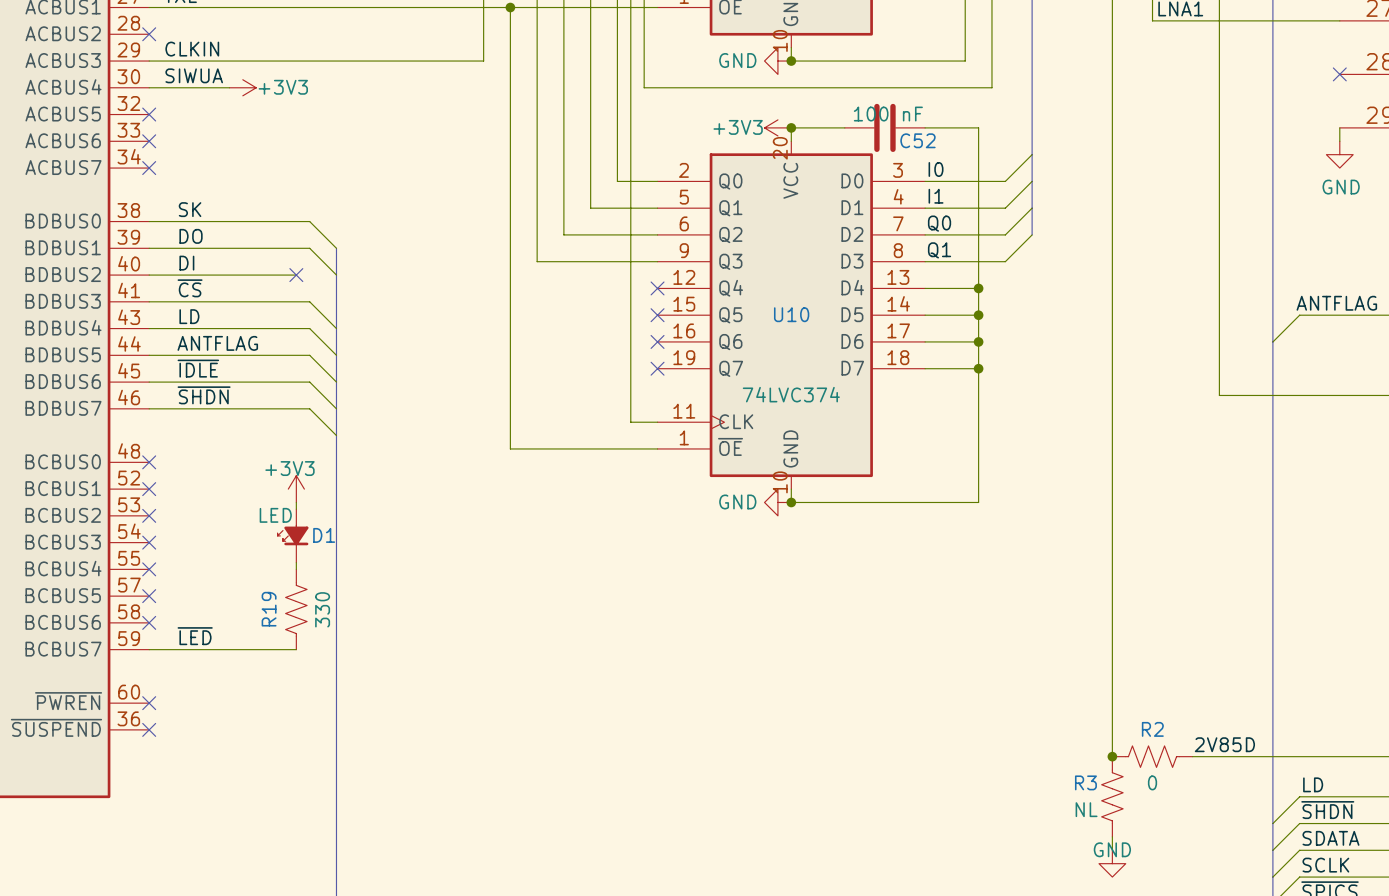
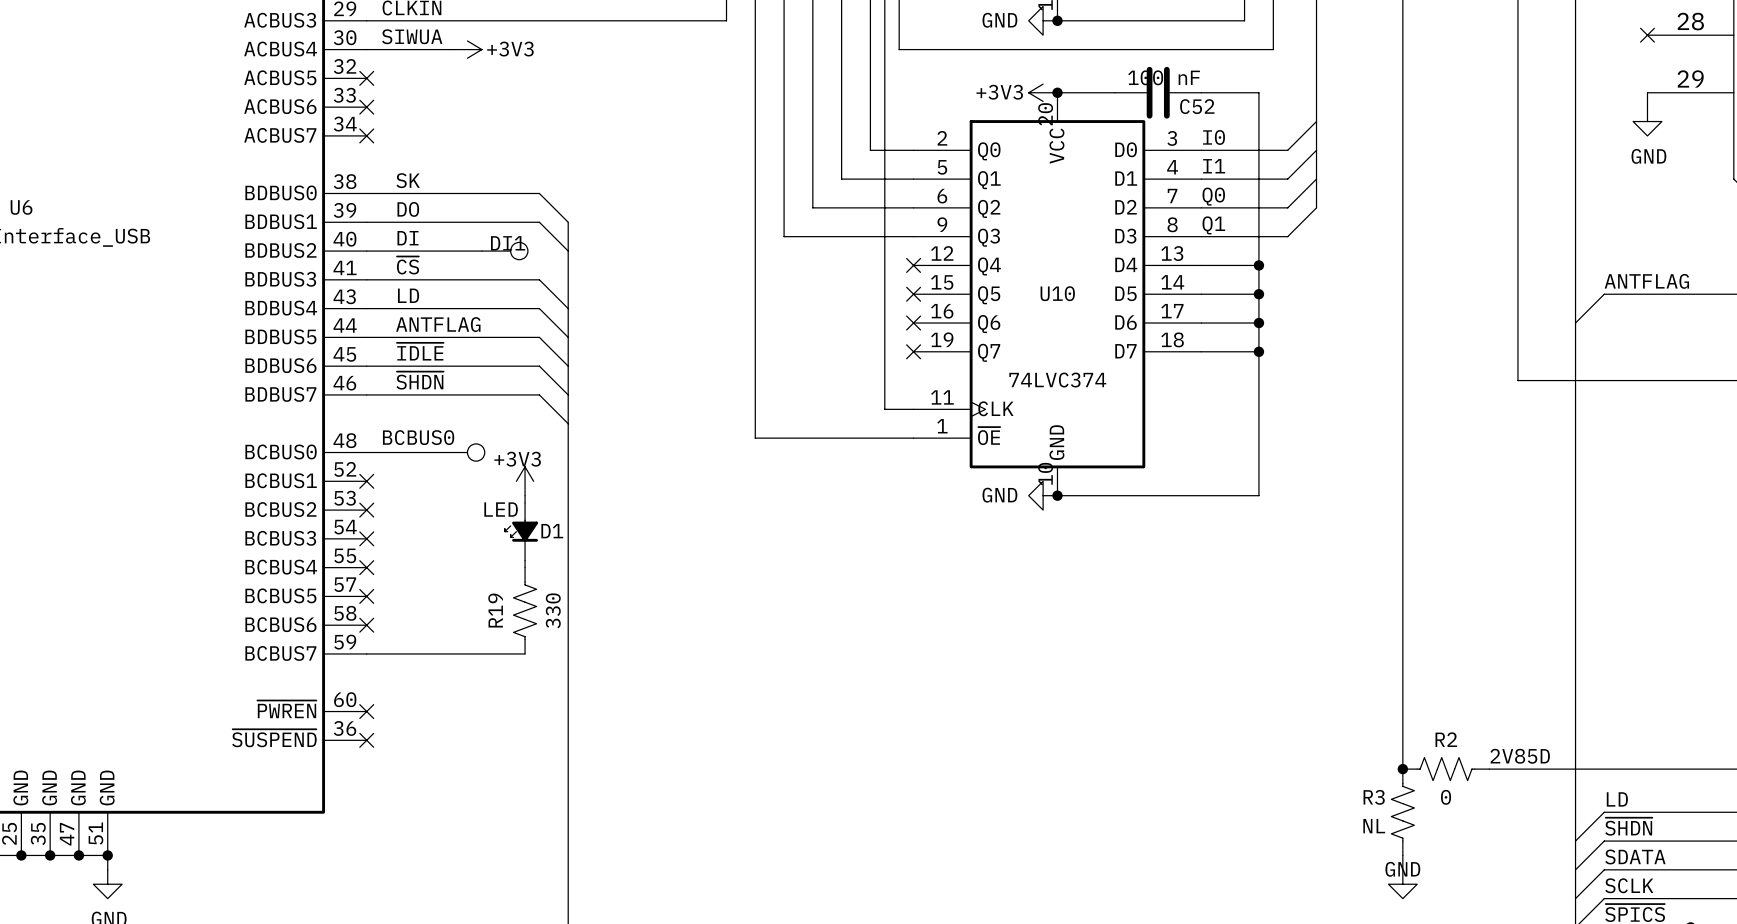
DI1: none -> (504, 251)
no-connect mark: (296, 275) -> none
wire: none -> (366, 452) (438, 452)
no-connect mark: (149, 462) -> none
BCBUS0: none -> (461, 452)
label: ~{LED} (195, 636) -> none

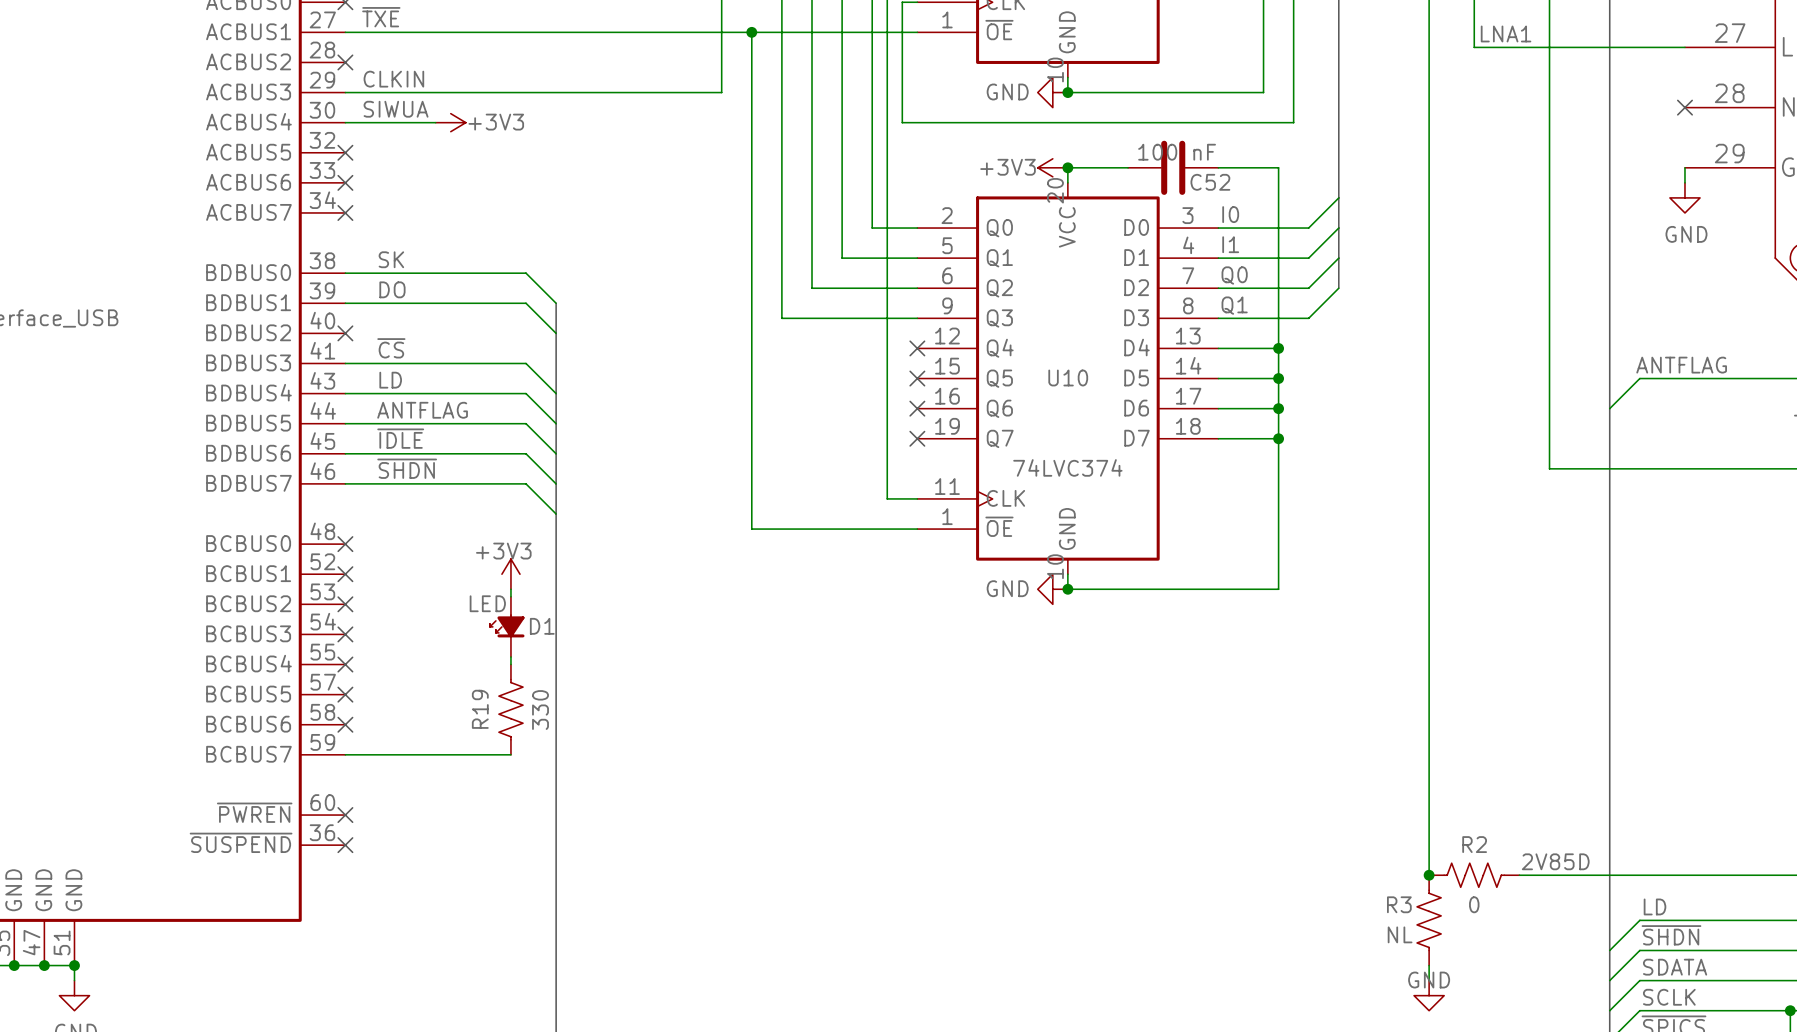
label: DI (408, 238) -> none
wire: (366, 251) (481, 251) -> none
no-connect mark: none -> (345, 333)
DI1: (504, 251) -> none
wire: (366, 452) (438, 452) -> none
no-connect mark: none -> (345, 544)
BCBUS0: (461, 452) -> none

